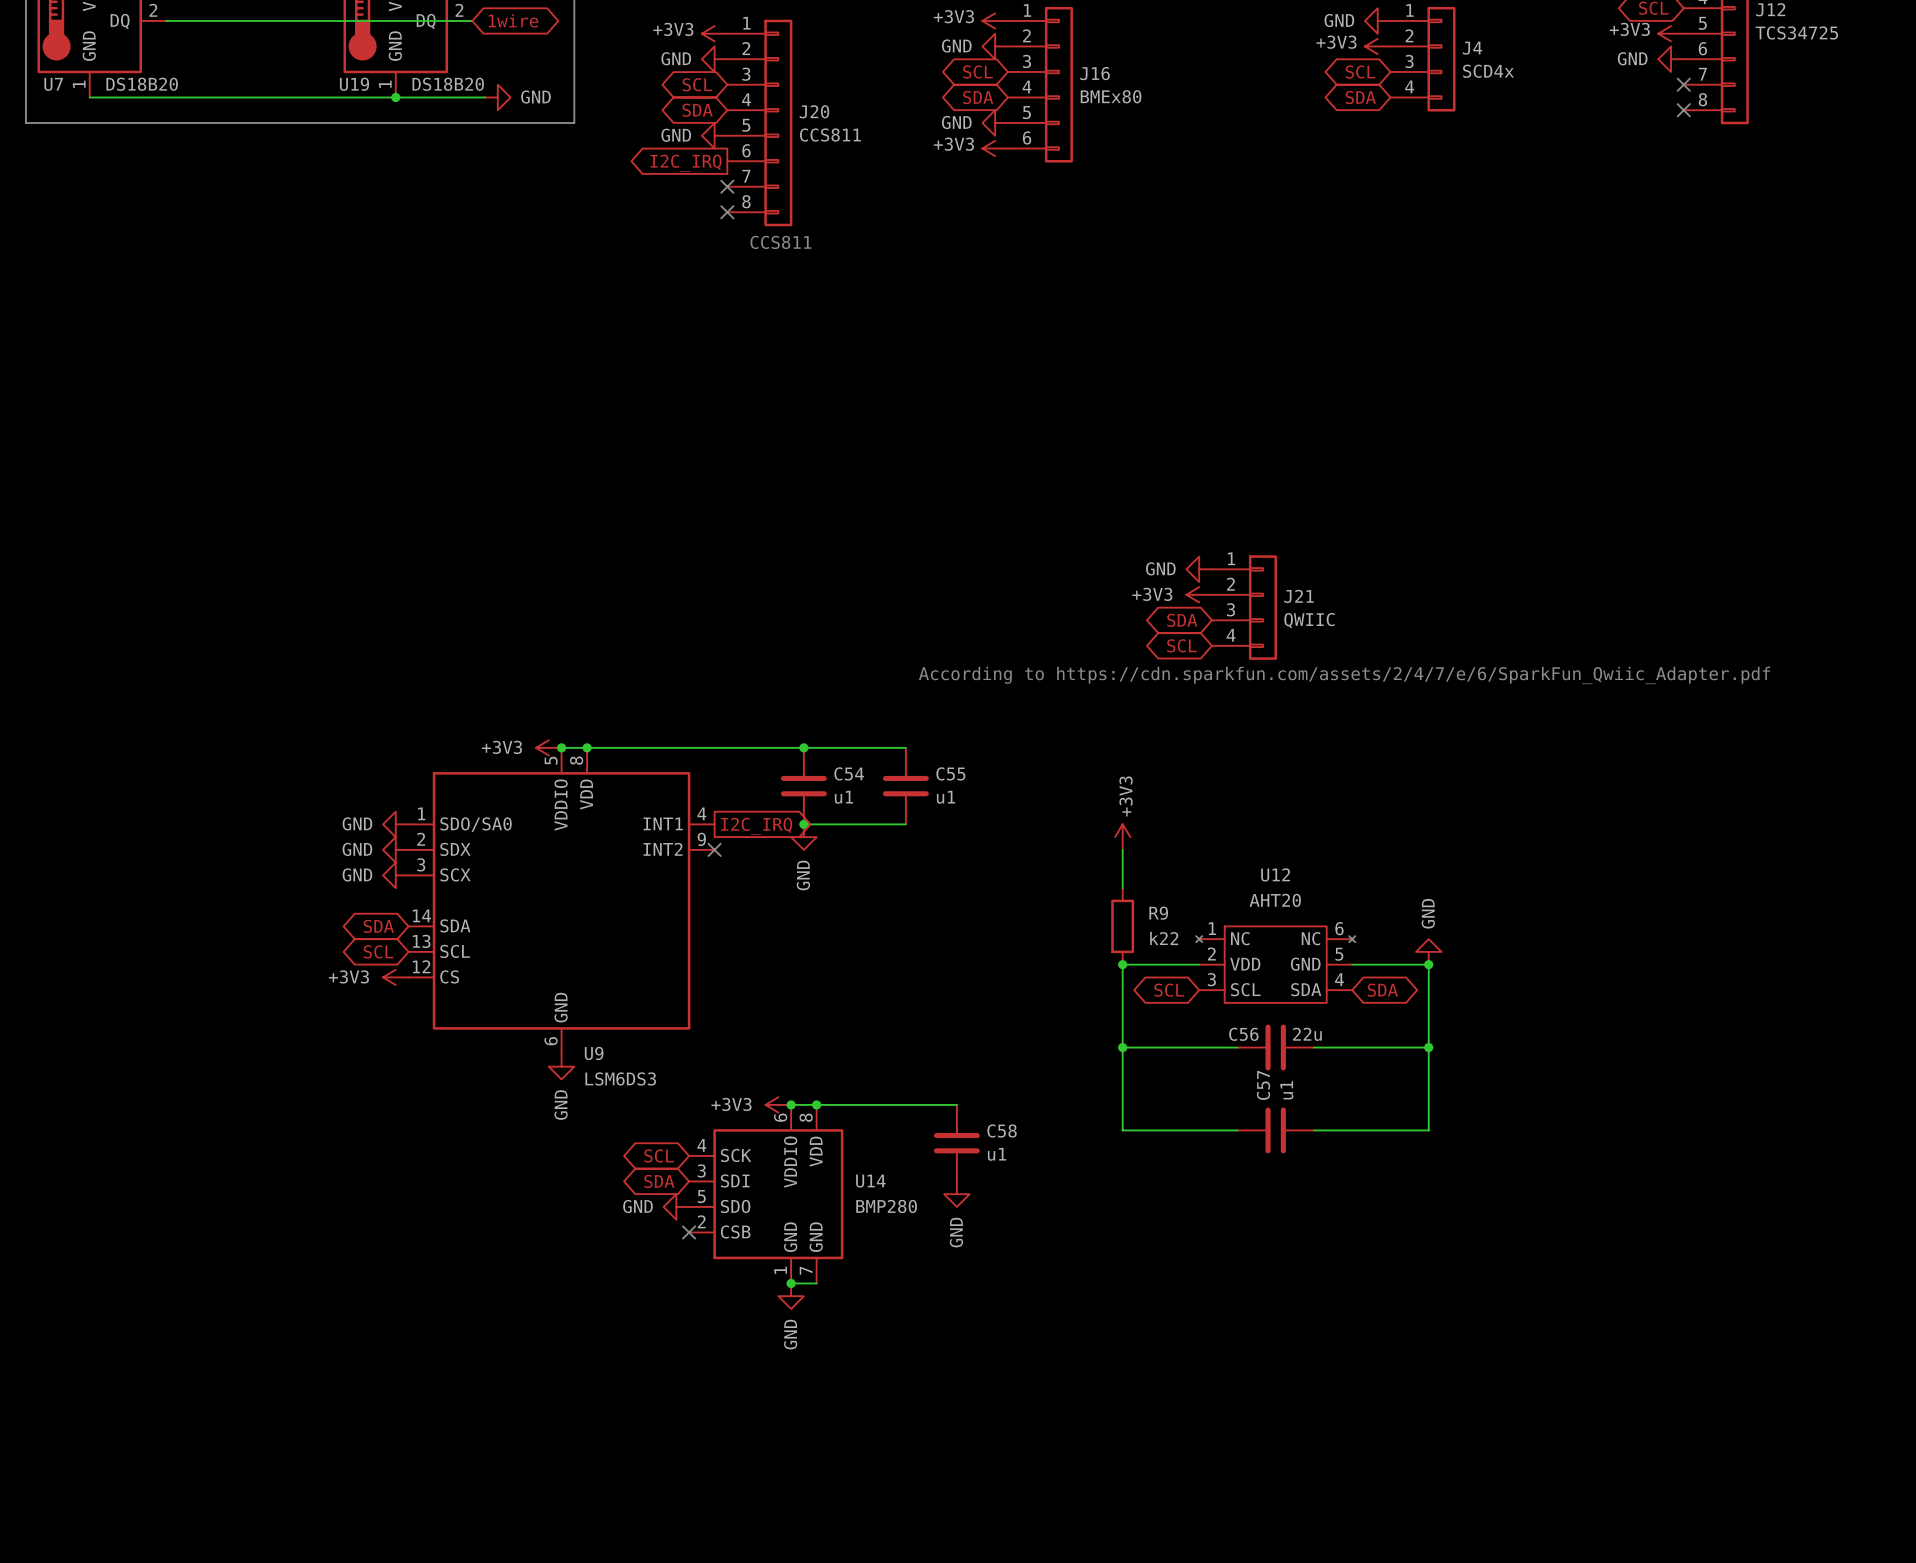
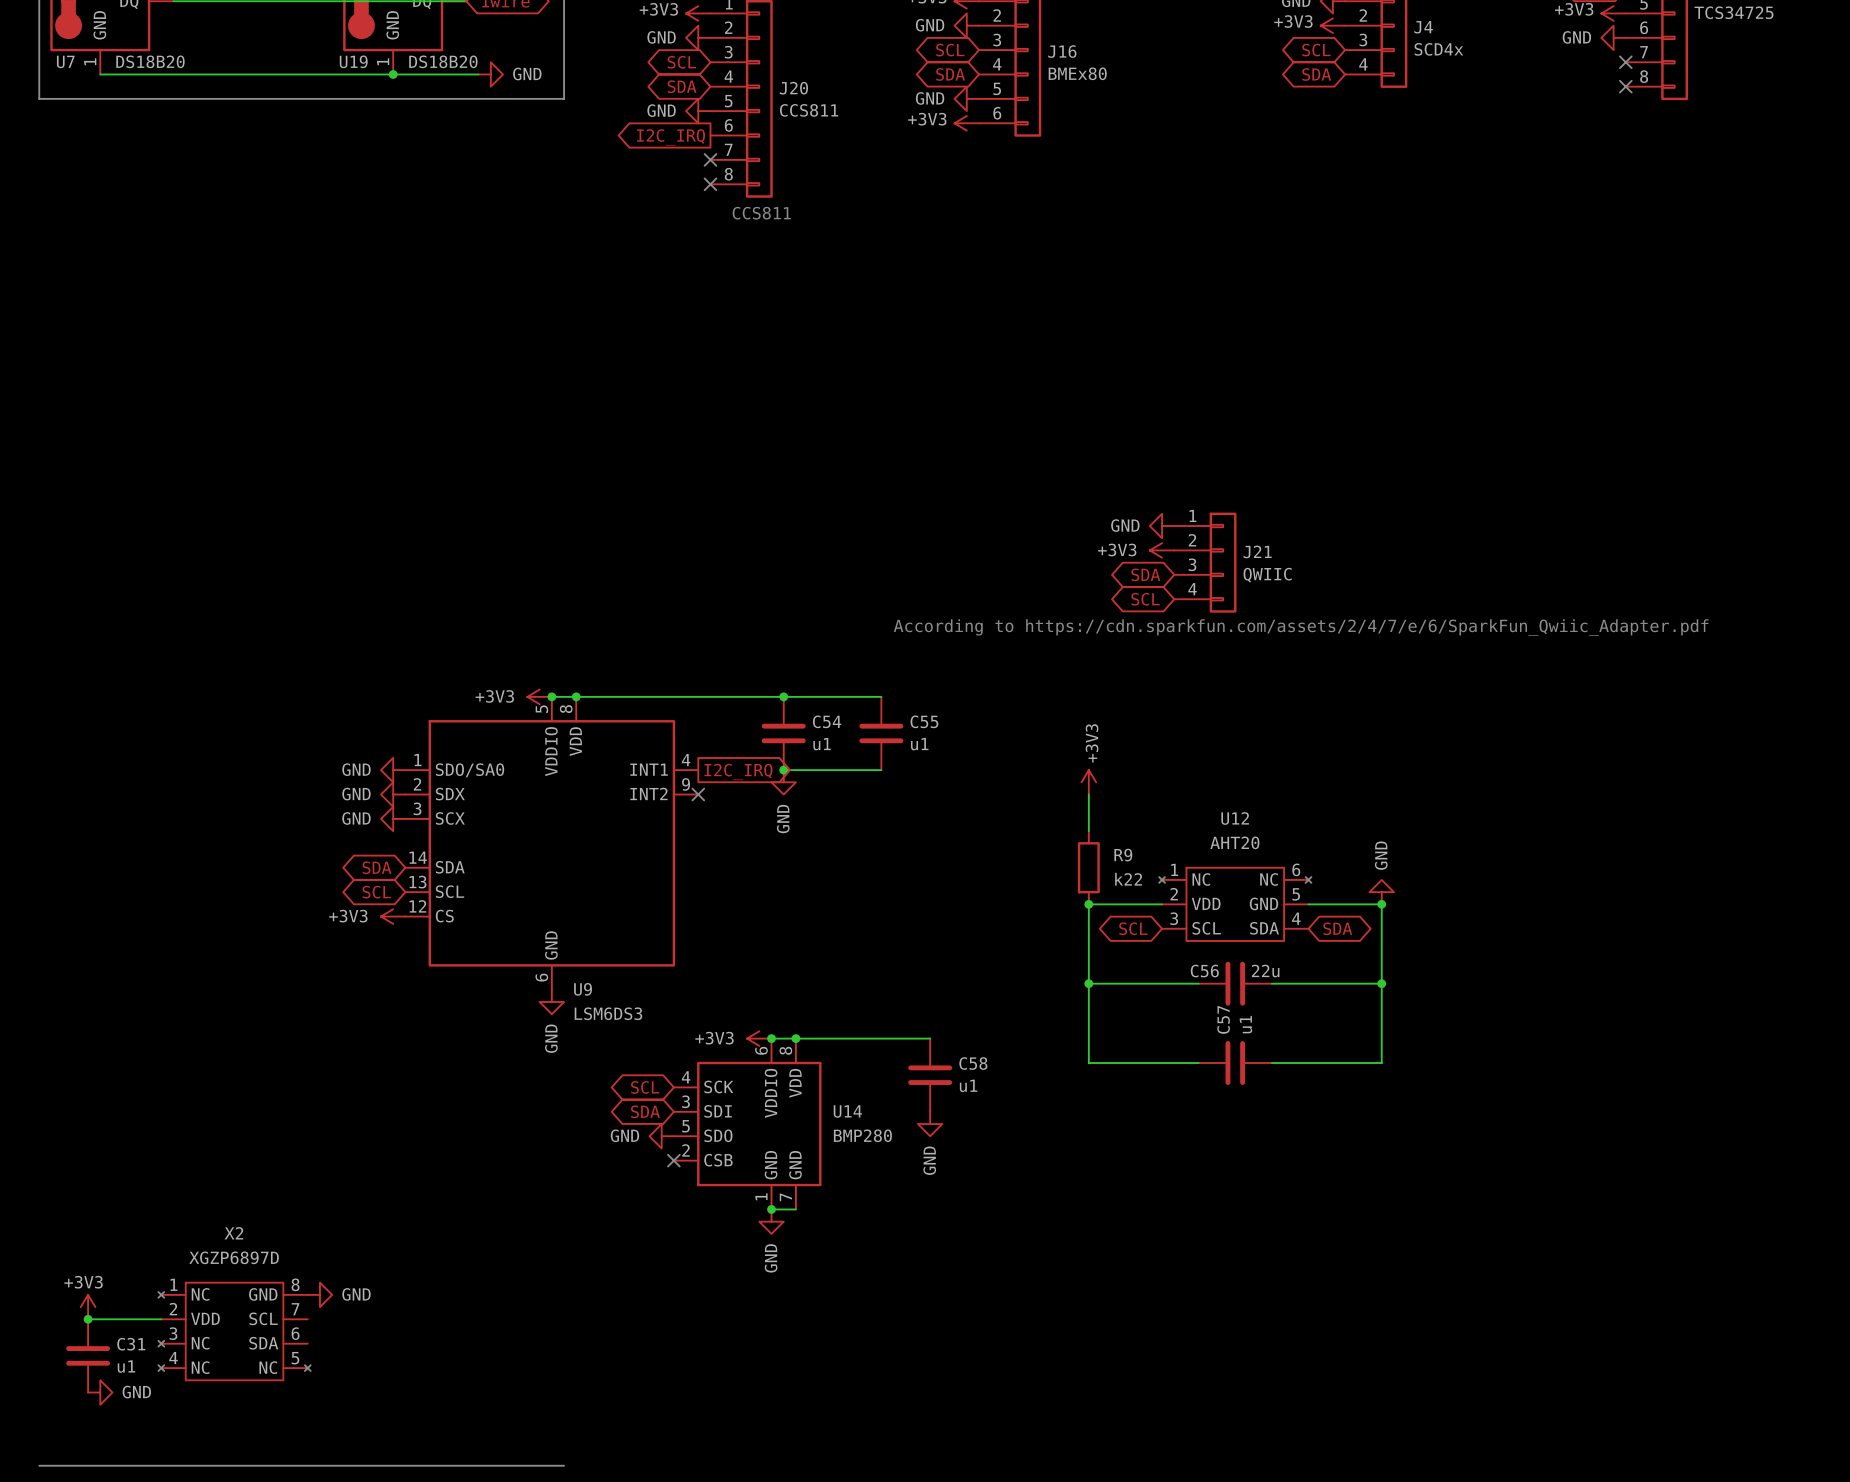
power symbol: none -> GND (319, 1294)
power symbol: none -> +3V3 (88, 1307)
wire: none -> (88, 1319) (161, 1319)
junction: none -> (88, 1319)
X2: none -> XGZP6897D (234, 1331)
C31: none -> u1 (88, 1355)
power symbol: none -> GND (100, 1392)
line: none -> (39, 1465) (564, 1465)

